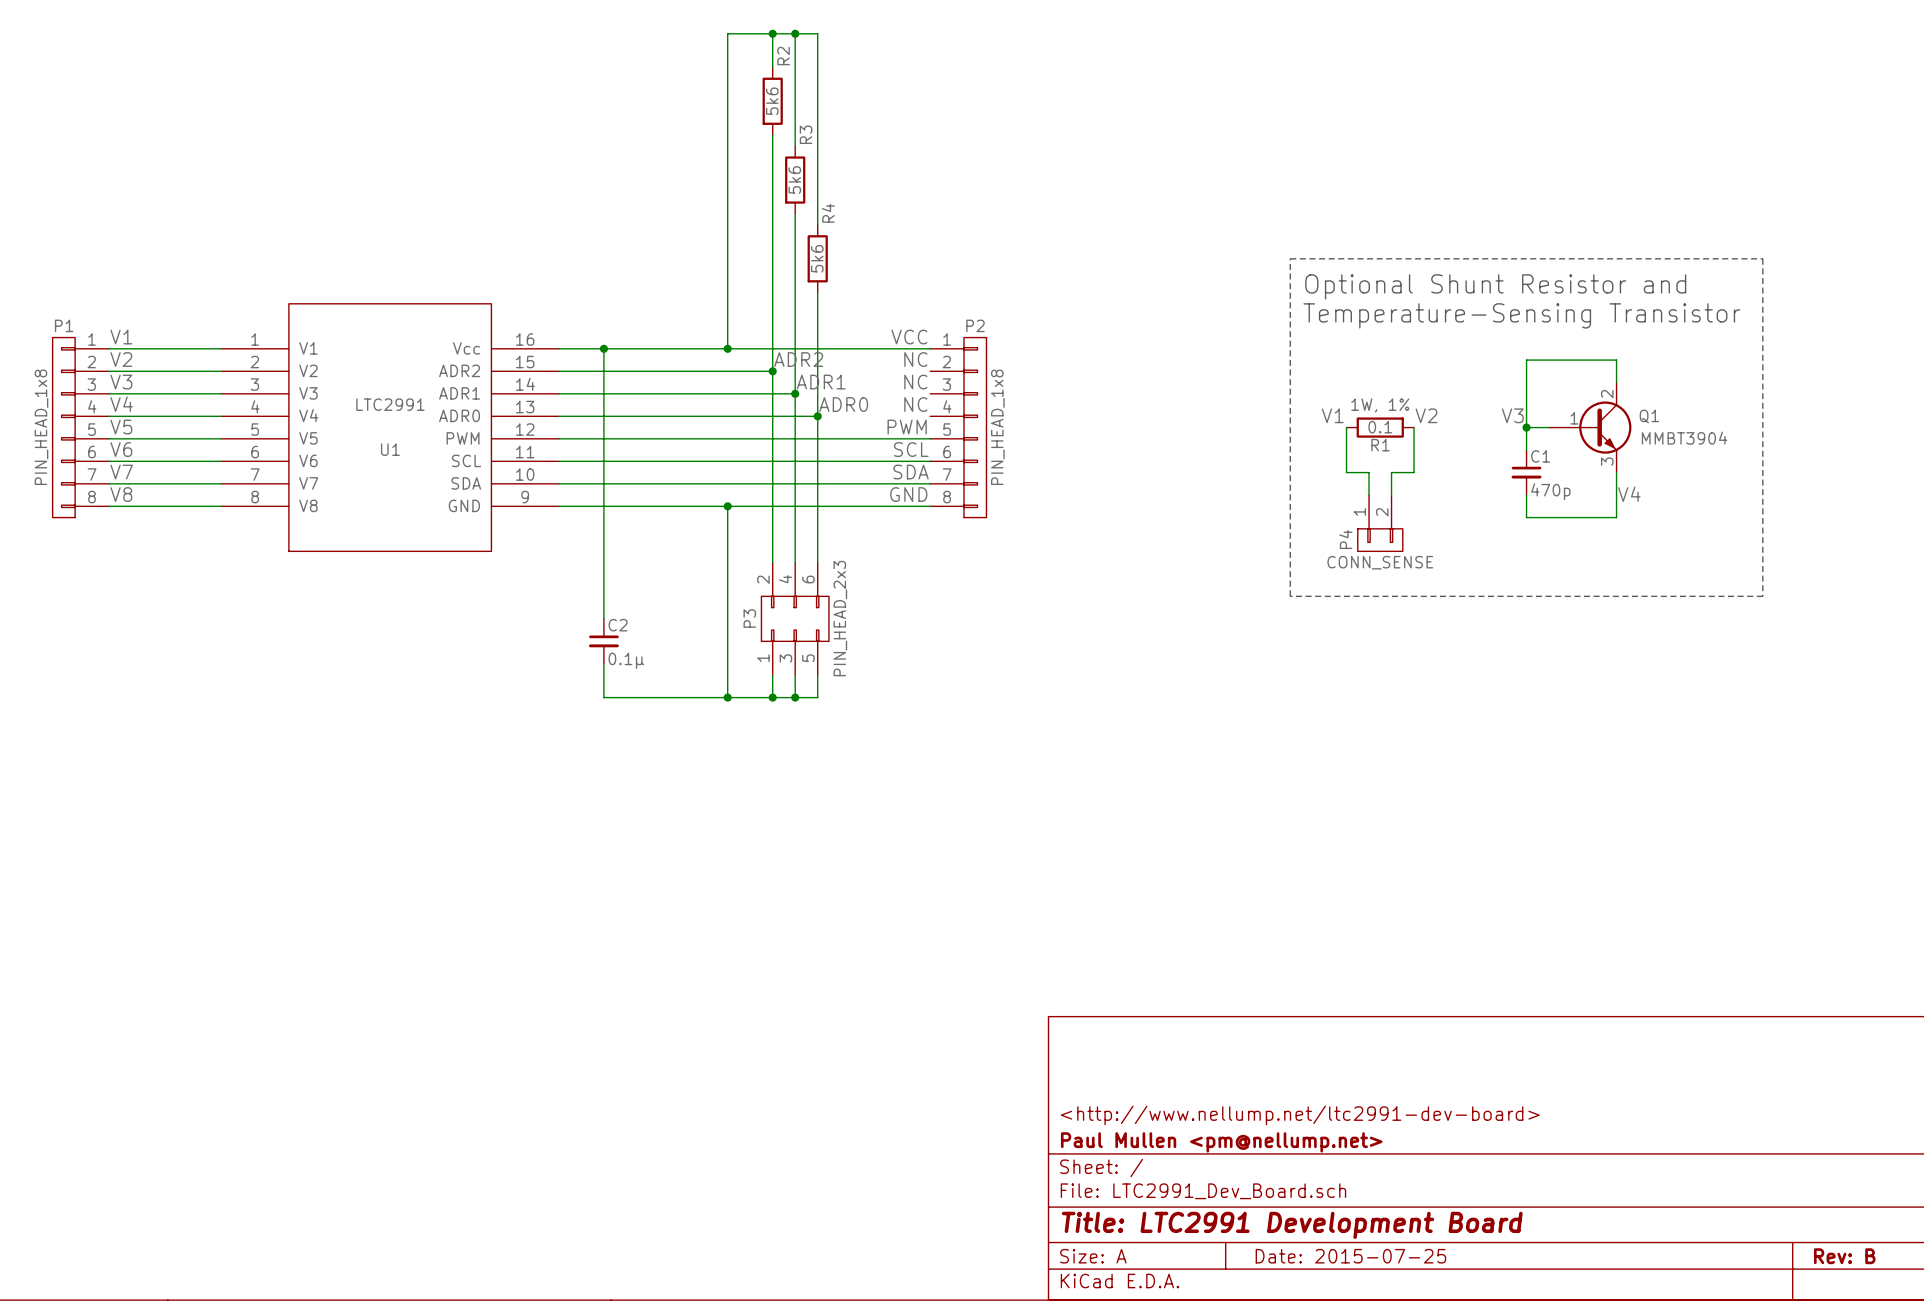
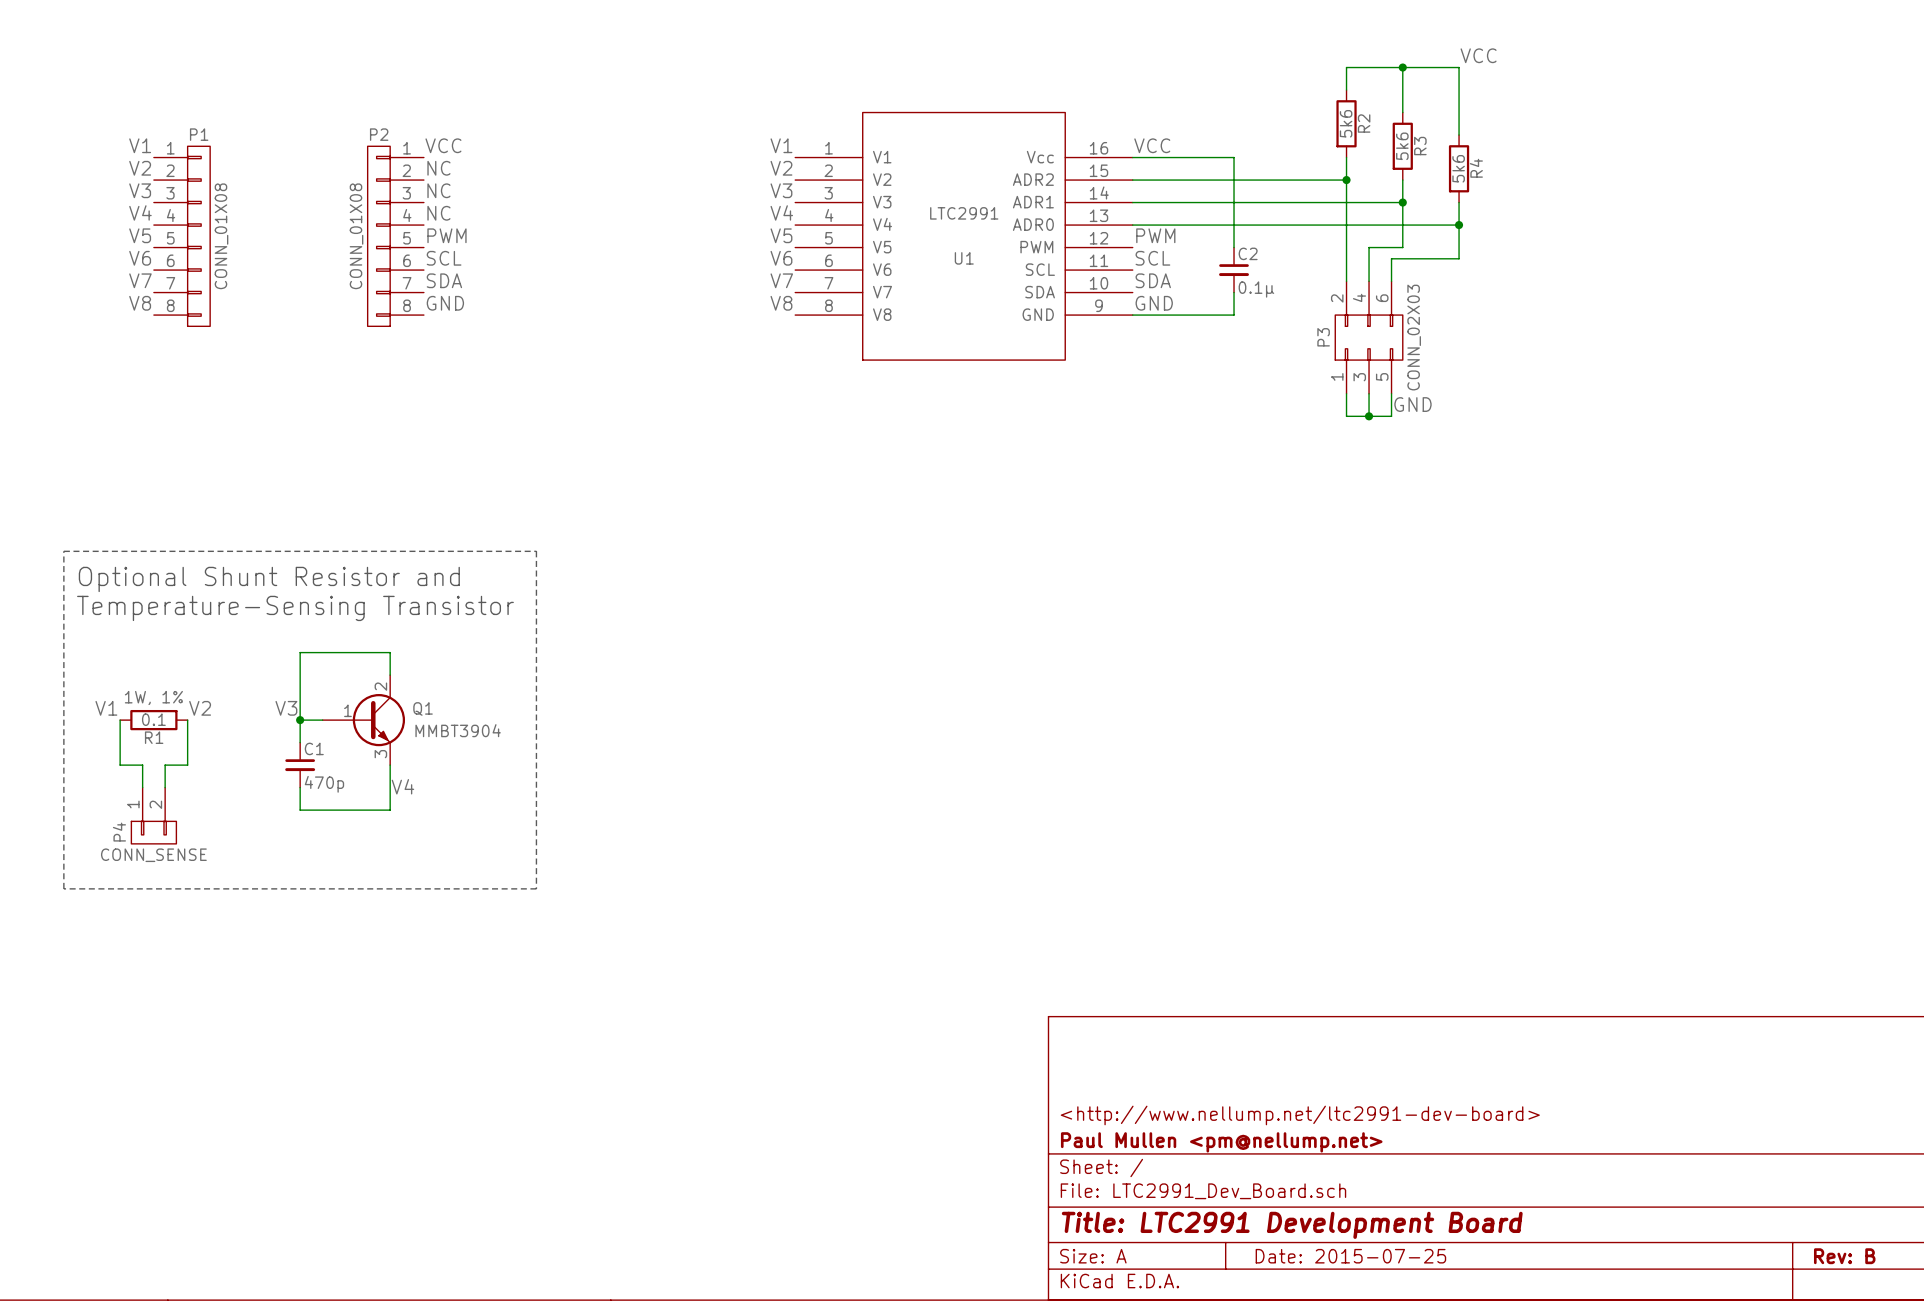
wire: (772, 33) (772, 67) -> none
junction: (772, 33) -> none
wire: (795, 33) (795, 146) -> none
junction: (795, 33) -> none
label: none -> VCC (1478, 55)
R2 name position: R2 (783, 56) -> R2 (1364, 123)
wire: none -> (1402, 67) (1402, 112)
junction: none -> (1402, 67)
wire: none -> (1346, 90) (1346, 67) (1459, 67) (1459, 135)
R2 position: (772, 101) -> (1346, 123)
R3 name position: R3 (806, 134) -> R3 (1420, 146)
wire: (772, 135) (772, 562) -> none
label: none -> V1 (140, 145)
label: none -> VCC (443, 145)
label: none -> V1 (781, 145)
label: none -> VCC (1152, 145)
wire: none -> (1132, 157) (1234, 157) (1234, 247)
wire: none -> (1346, 157) (1346, 281)
label: none -> V2 (140, 168)
label: none -> NC (438, 168)
label: none -> V2 (781, 168)
R3 position: (795, 180) -> (1402, 146)
wire: none -> (1132, 180) (1346, 180)
junction: none -> (1346, 180)
wire: none -> (1402, 180) (1402, 247) (1369, 247) (1369, 281)
label: none -> V3 (140, 190)
label: none -> NC (438, 190)
label: none -> V3 (781, 190)
wire: none -> (1132, 202) (1402, 202)
junction: none -> (1402, 202)
wire: none -> (1459, 202) (1459, 258) (1391, 258) (1391, 281)
label: none -> V4 (781, 212)
label: none -> NC (438, 213)
wire: (795, 213) (795, 562) -> none
R4 name position: R4 (828, 213) -> R4 (1476, 168)
wire: (817, 225) (817, 33) (727, 33) (727, 348) -> none
wire: none -> (1132, 225) (1459, 225)
junction: none -> (1459, 225)
label: none -> PWM (446, 235)
label: none -> V5 (781, 235)
label: none -> PWM (1155, 235)
label: none -> SCL (444, 258)
label: none -> V6 (781, 258)
R4 position: (817, 258) -> (1459, 168)
label: none -> SCL (1152, 258)
line: (1290, 258) (1762, 258) (1762, 596) (1290, 596) (1290, 258) -> none
label: none -> SDA (444, 280)
label: none -> V7 (781, 280)
label: none -> SDA (1153, 280)
text: Optional Shunt Resistor and (1495, 286) -> none
wire: (817, 292) (817, 562) -> none
wire: none -> (1234, 292) (1234, 315) (1132, 315)
label: none -> GND (445, 303)
label: none -> V8 (781, 303)
label: none -> GND (1154, 303)
text: Temperature-Sensing Transistor (1521, 315) -> none
label: V1 (121, 337) -> none
label: VCC (909, 337) -> none
wire: (108, 348) (221, 348) -> none
wire: (558, 348) (930, 348) -> none
wire: (603, 348) (603, 618) -> none
junction: (603, 348) -> none
junction: (727, 348) -> none
label: V2 (121, 359) -> none
label: ADR2 (798, 359) -> none
label: NC (915, 359) -> none
wire: (108, 371) (221, 371) -> none
wire: (558, 371) (772, 371) -> none
junction: (772, 371) -> none
label: V3 (121, 382) -> none
label: ADR1 (821, 382) -> none
label: NC (915, 382) -> none
wire: (1616, 382) (1616, 360) (1526, 360) (1526, 450) -> none
wire: (108, 393) (221, 393) -> none
wire: (558, 393) (795, 393) -> none
junction: (795, 393) -> none
wire: none -> (1346, 393) (1346, 416) (1391, 416) (1391, 393)
wire: none -> (1369, 393) (1369, 416)
label position: V4 (121, 404) -> V4 (140, 212)
label: ADR0 (843, 404) -> none
label: NC (915, 404) -> none
label: none -> GND (1412, 404)
label: V1 (1332, 415) -> none
label: V2 (1426, 415) -> none
label: V3 (1512, 415) -> none
wire: (108, 416) (221, 416) -> none
wire: (558, 416) (817, 416) -> none
junction: (817, 416) -> none
junction: none -> (1369, 416)
P1 value: PIN_HEAD_1x8 (41, 427) -> CONN_01X08 (221, 236)
P1 flip: as is (63, 427) -> left-right (198, 236)
P1 position: (80, 427) -> (182, 236)
label position: V5 (121, 427) -> V5 (140, 235)
U1 position: (390, 427) -> (963, 236)
label: PWM (907, 427) -> none
P2 position: (958, 427) -> (395, 236)
P2 flip: as is (975, 427) -> left-right (378, 236)
P2 value: PIN_HEAD_1x8 (997, 427) -> CONN_01X08 (356, 236)
wire: (1346, 427) (1346, 472) (1369, 472) (1369, 495) -> none
R1 position: (1380, 427) -> (153, 720)
wire: (1414, 427) (1414, 472) (1391, 472) (1391, 495) -> none
wire: (1526, 427) (1549, 427) -> none
junction: (1526, 427) -> none
Q1 position: (1590, 427) -> (363, 720)
wire: (108, 438) (221, 438) -> none
wire: (558, 438) (930, 438) -> none
label position: V6 (121, 449) -> V6 (140, 258)
label: SCL (911, 449) -> none
wire: (108, 461) (221, 461) -> none
wire: (558, 461) (930, 461) -> none
label position: V7 (121, 472) -> V7 (140, 280)
label: SDA (911, 472) -> none
C1 position: (1526, 472) -> (300, 765)
wire: (1616, 472) (1616, 517) (1526, 517) (1526, 495) -> none
wire: (108, 483) (221, 483) -> none
wire: (558, 483) (930, 483) -> none
label position: V8 (121, 494) -> V8 (140, 303)
label: GND (908, 494) -> none
label: V4 (1629, 494) -> none
wire: (108, 506) (221, 506) -> none
wire: (558, 506) (930, 506) -> none
wire: (727, 506) (727, 697) -> none
junction: (727, 506) -> none
P4 position: (1380, 523) -> (153, 815)
line: none -> (63, 551) (536, 551) (536, 888) (63, 888) (63, 551)
text: none -> Optional Shunt Resistor and (269, 579)
text: none -> Temperature-Sensing Transistor (295, 608)
P3 position: (795, 618) -> (1369, 337)
P3 value: PIN_HEAD_2x3 (840, 618) -> CONN_02X03 (1414, 337)
C2 position: (603, 641) -> (1234, 270)
wire: (603, 663) (603, 697) (817, 697) (817, 675) -> none
wire: none -> (390, 675) (390, 652) (300, 652) (300, 742)
wire: (772, 675) (772, 697) -> none
wire: (795, 675) (795, 697) -> none
junction: (727, 697) -> none
junction: (772, 697) -> none
junction: (795, 697) -> none
label: none -> V1 (106, 708)
label: none -> V2 (200, 708)
label: none -> V3 (286, 708)
wire: none -> (120, 720) (120, 765) (142, 765) (142, 787)
wire: none -> (187, 720) (187, 765) (165, 765) (165, 787)
wire: none -> (300, 720) (322, 720)
junction: none -> (300, 720)
wire: none -> (390, 765) (390, 810) (300, 810) (300, 787)
label: none -> V4 (402, 786)

